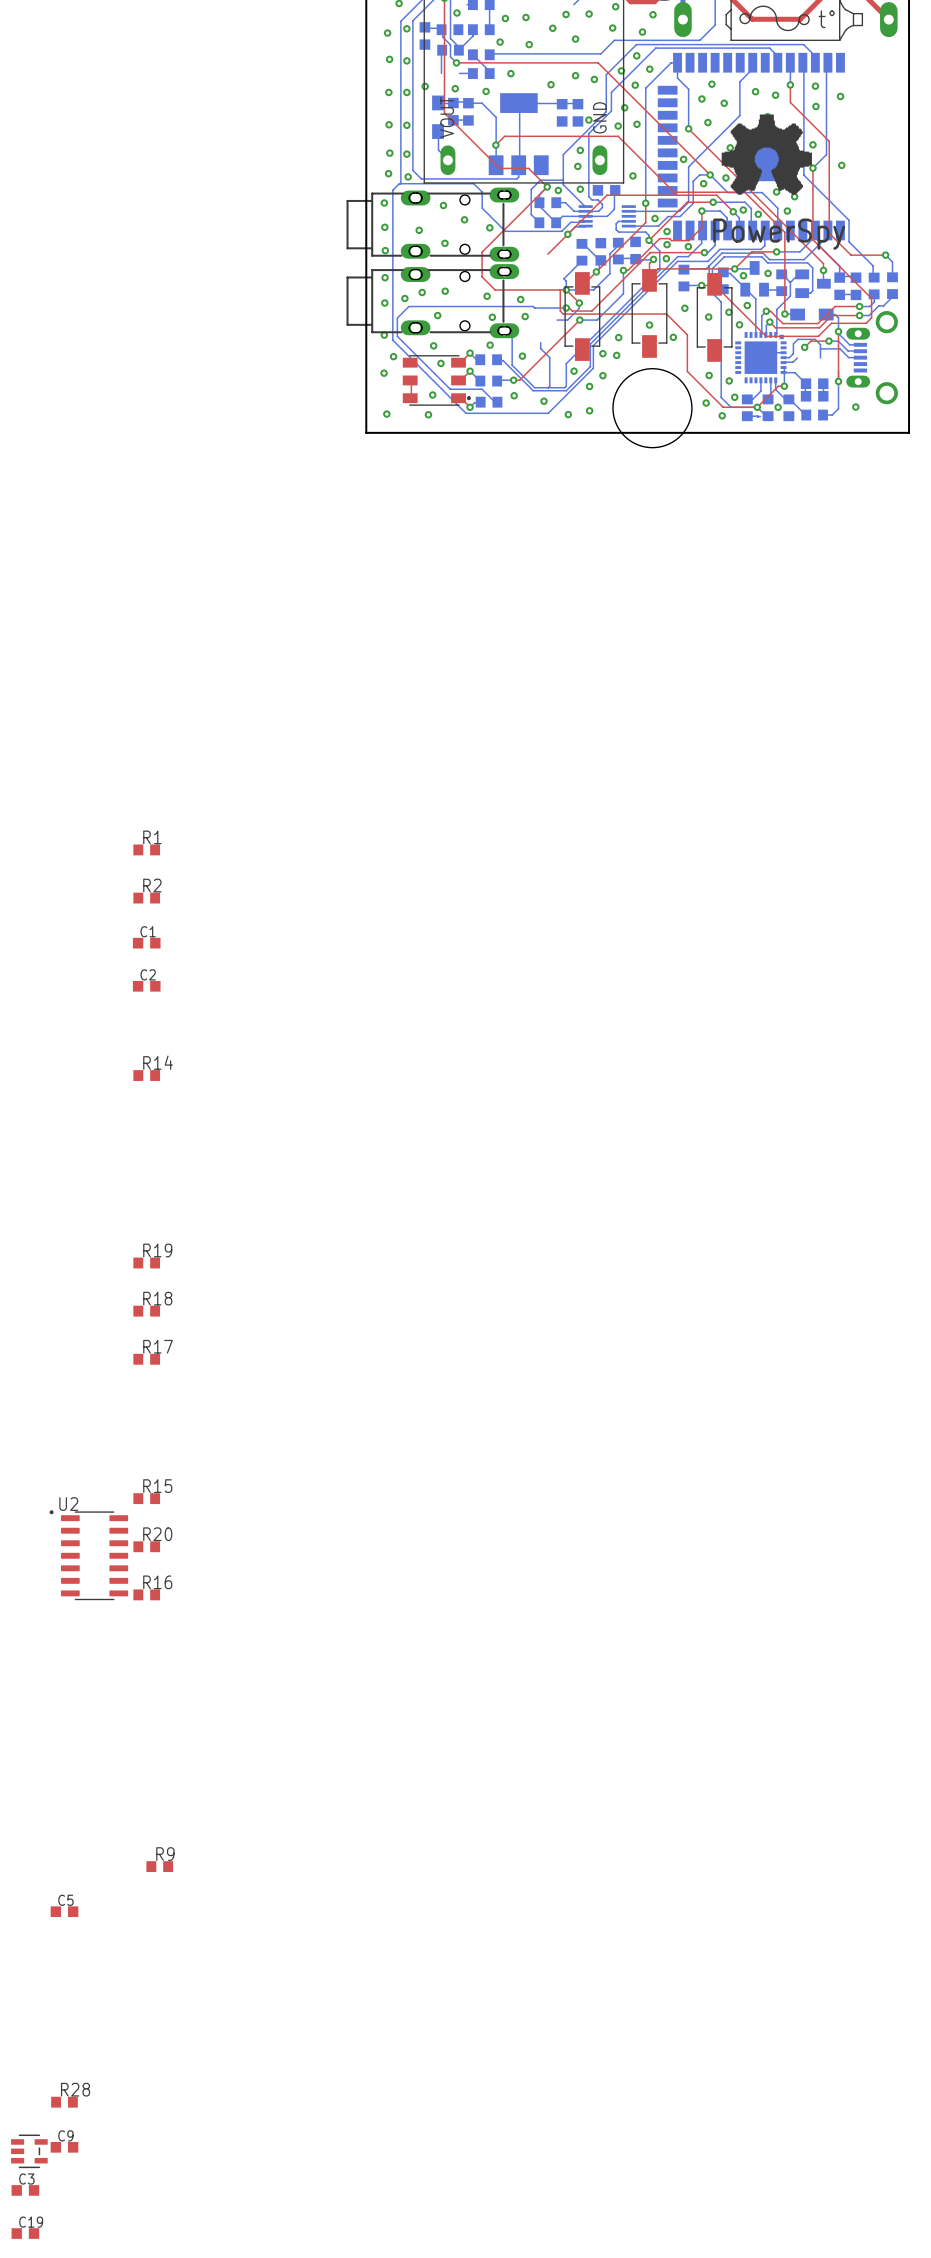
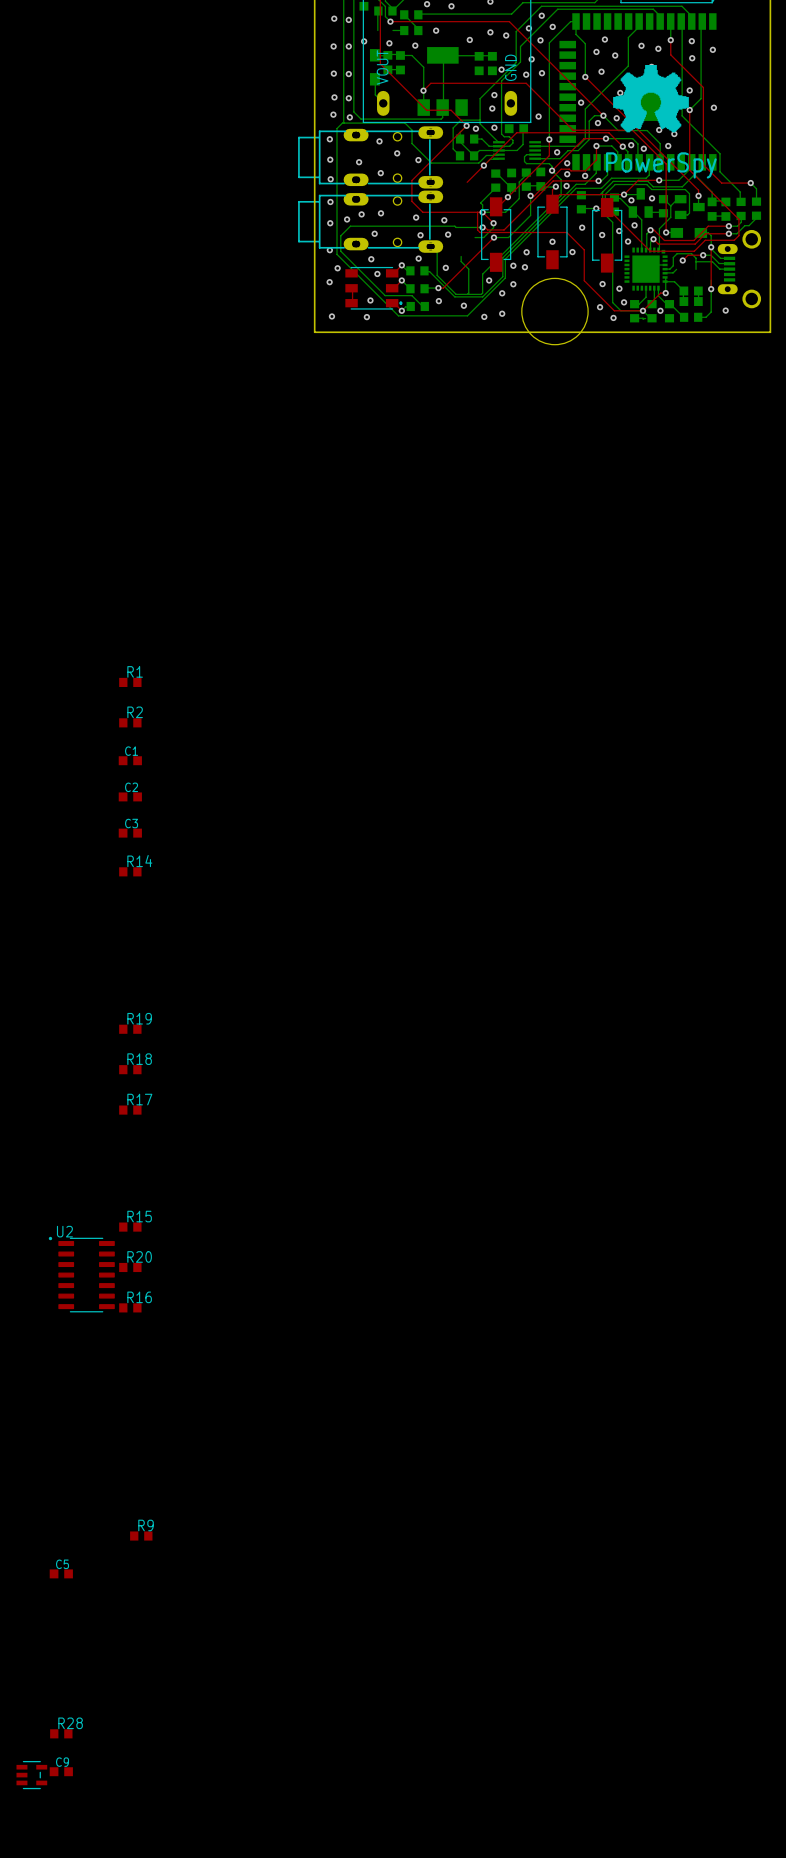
C3 position: (25, 2190) -> (130, 833)
C19: (25, 2233) -> none

